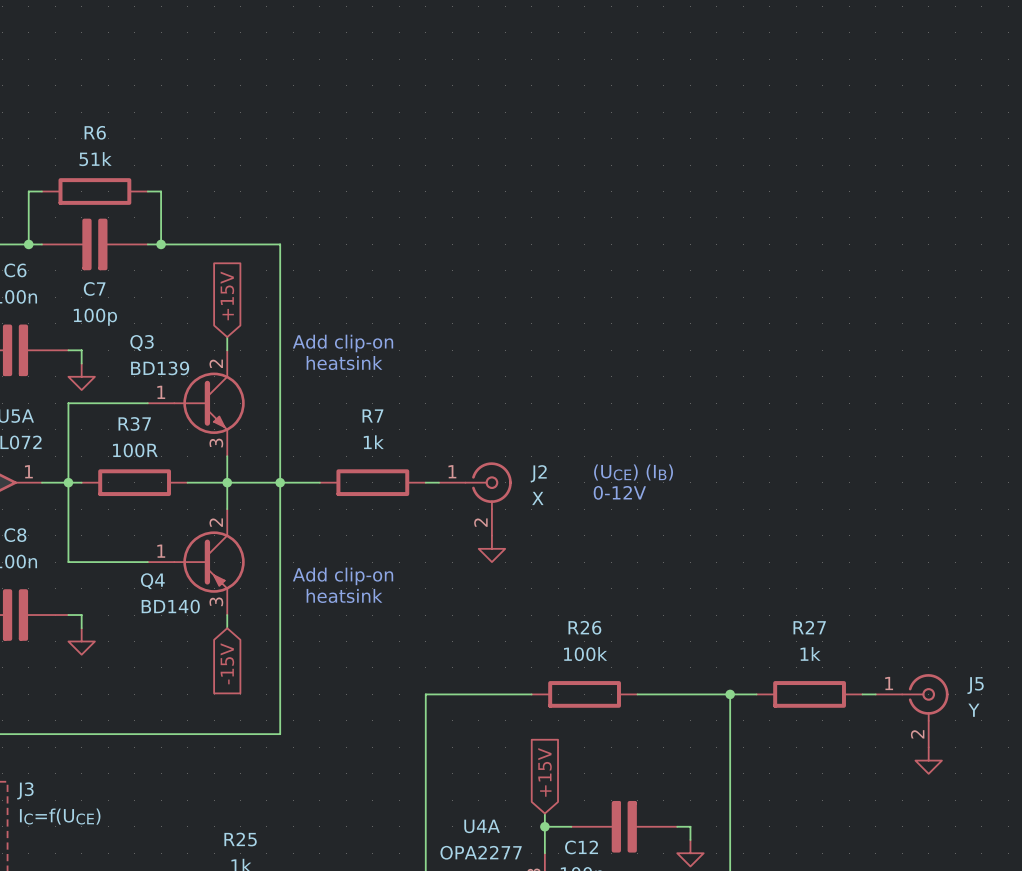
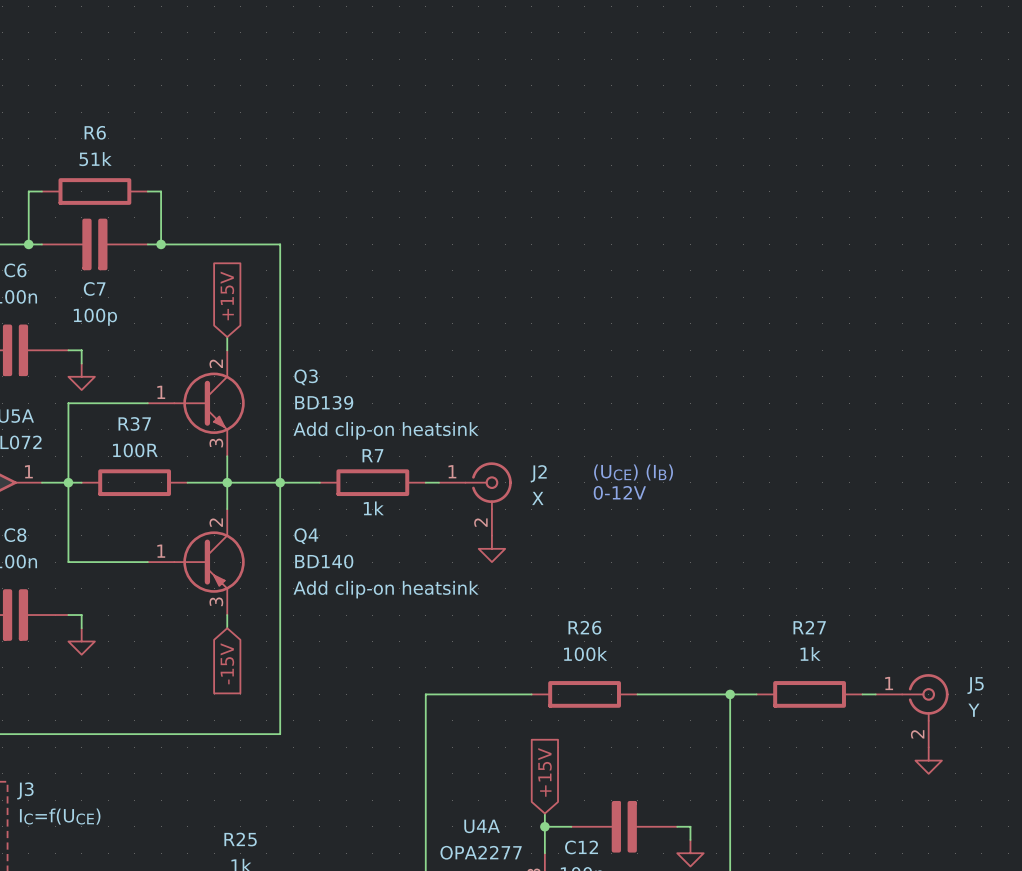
Q3 name position: Q3 (142, 342) -> Q3 (306, 377)
text: Add clip-on (343, 343) -> none
text: heatsink (344, 363) -> none
Q3 value position: BD139 (160, 368) -> BD139 (324, 402)
R7 name position: R7 (372, 416) -> R7 (372, 455)
Q3 text: none -> Add clip-on heatsink (386, 430)
R7 value position: 1k (373, 442) -> 1k (373, 508)
text: Add clip-on (343, 576) -> none
Q4 name position: Q4 (152, 581) -> Q4 (306, 536)
Q4 text: none -> Add clip-on heatsink (386, 589)
text: heatsink (344, 595) -> none
Q4 value position: BD140 (170, 606) -> BD140 (324, 561)

